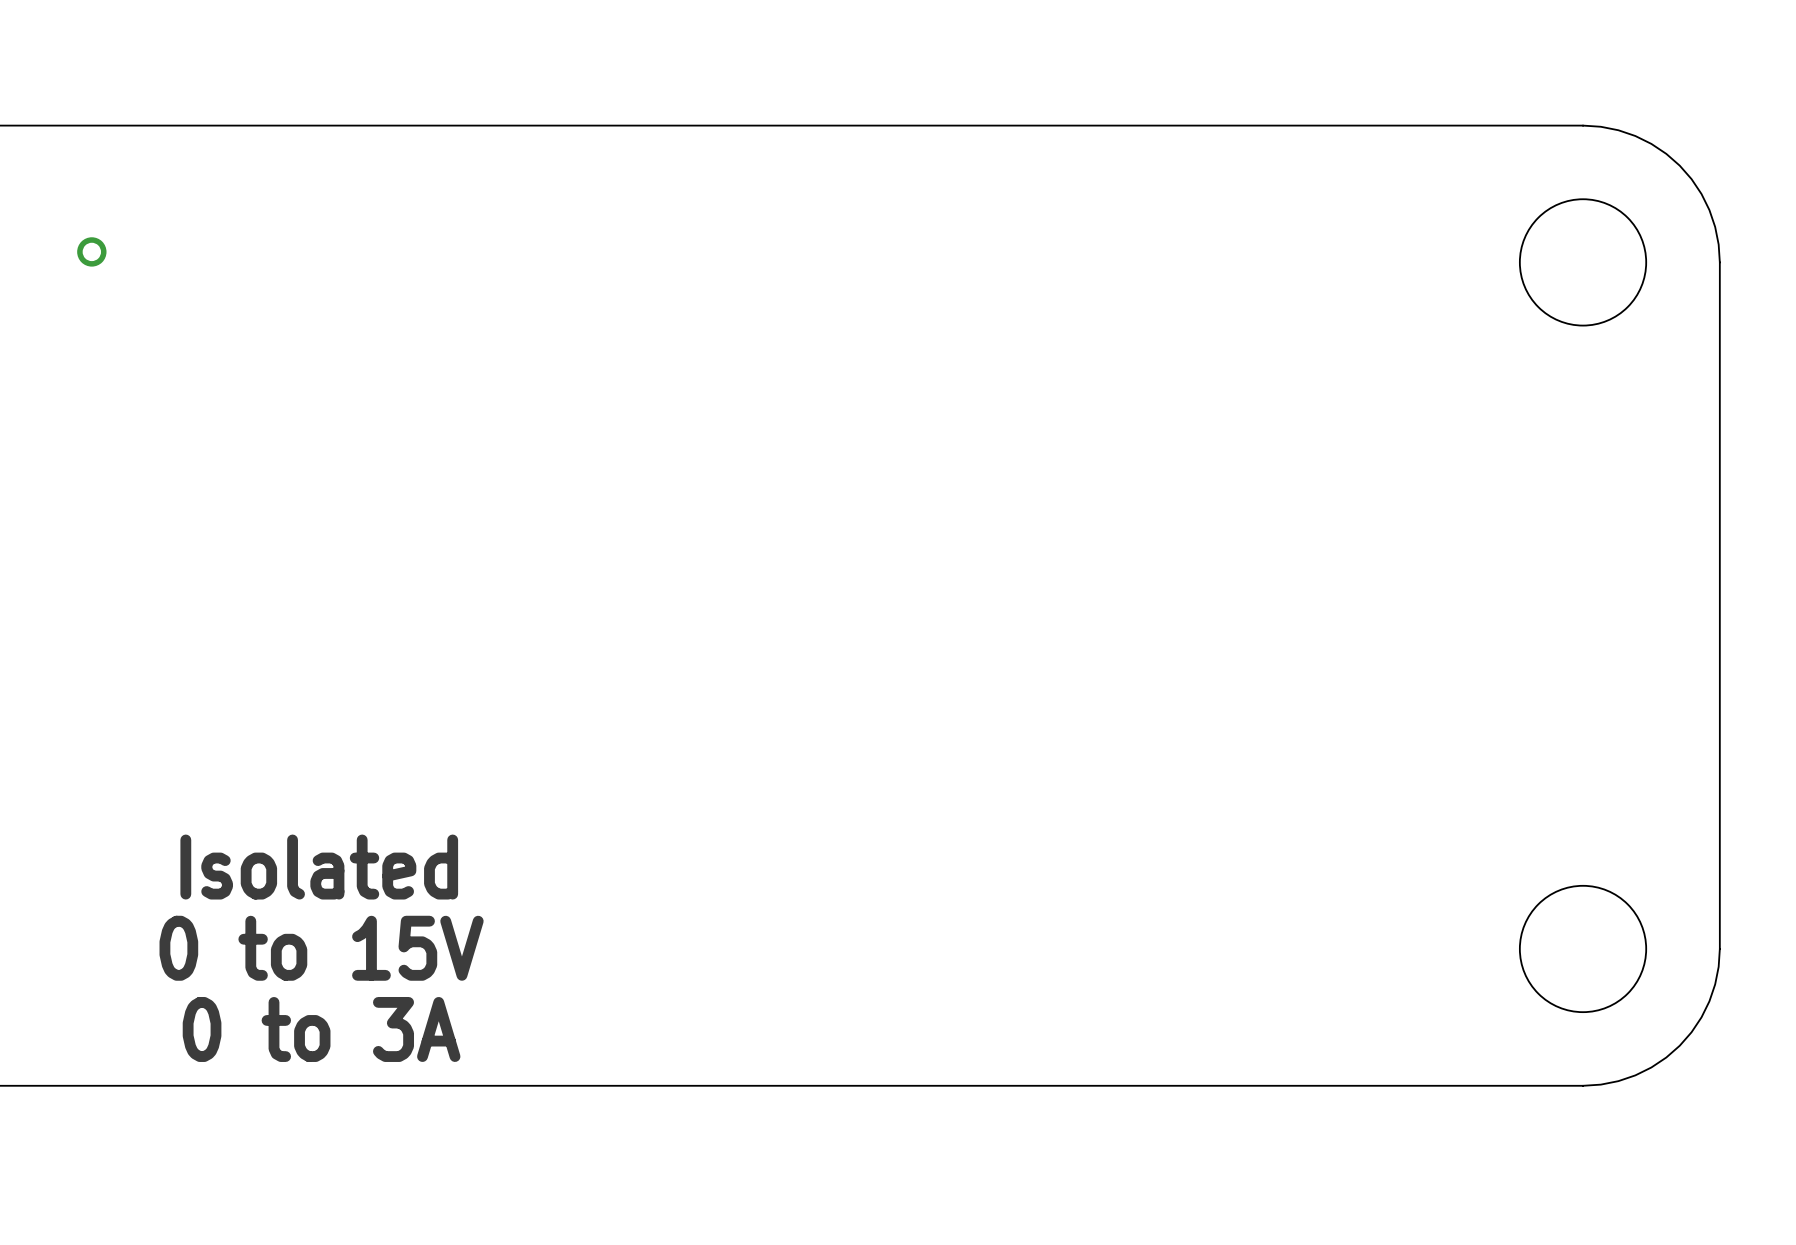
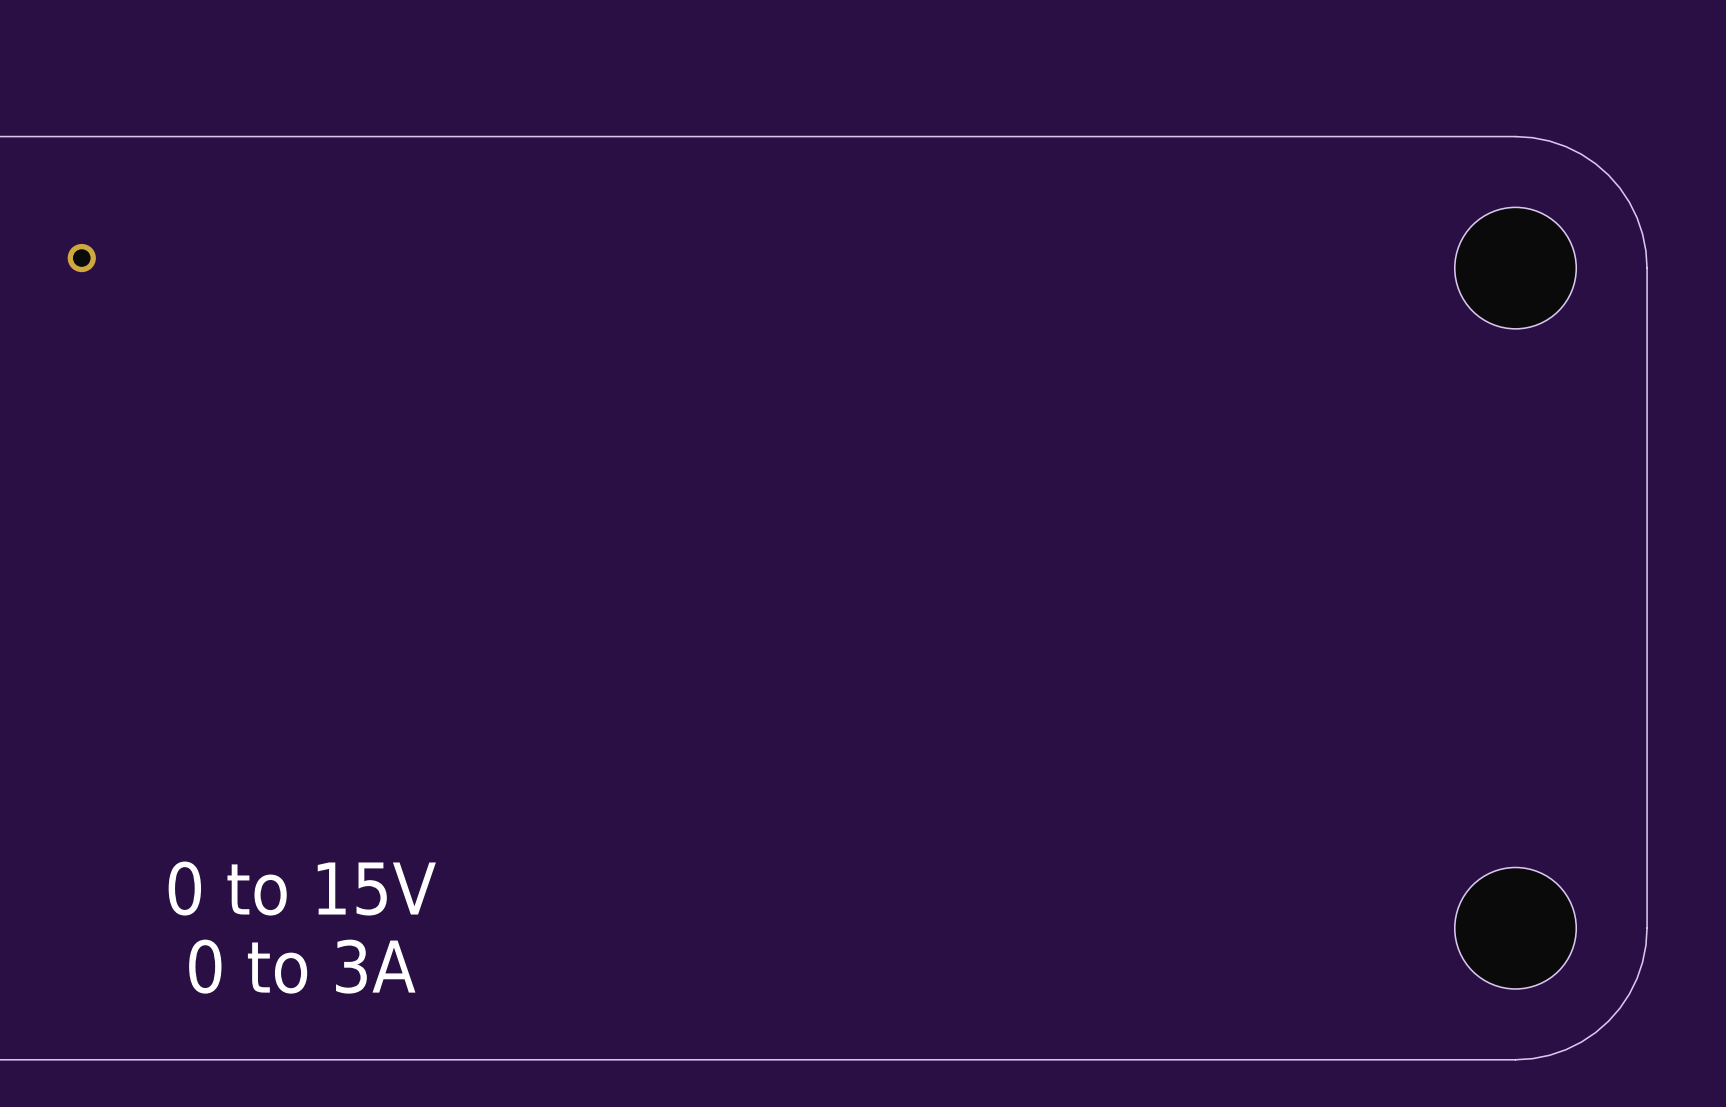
text: Isolated (319, 867) -> none
text position: 0 to 15V (321, 948) -> 0 to 15V (302, 888)
text position: 0 to 3A (321, 1029) -> 0 to 3A (302, 966)

